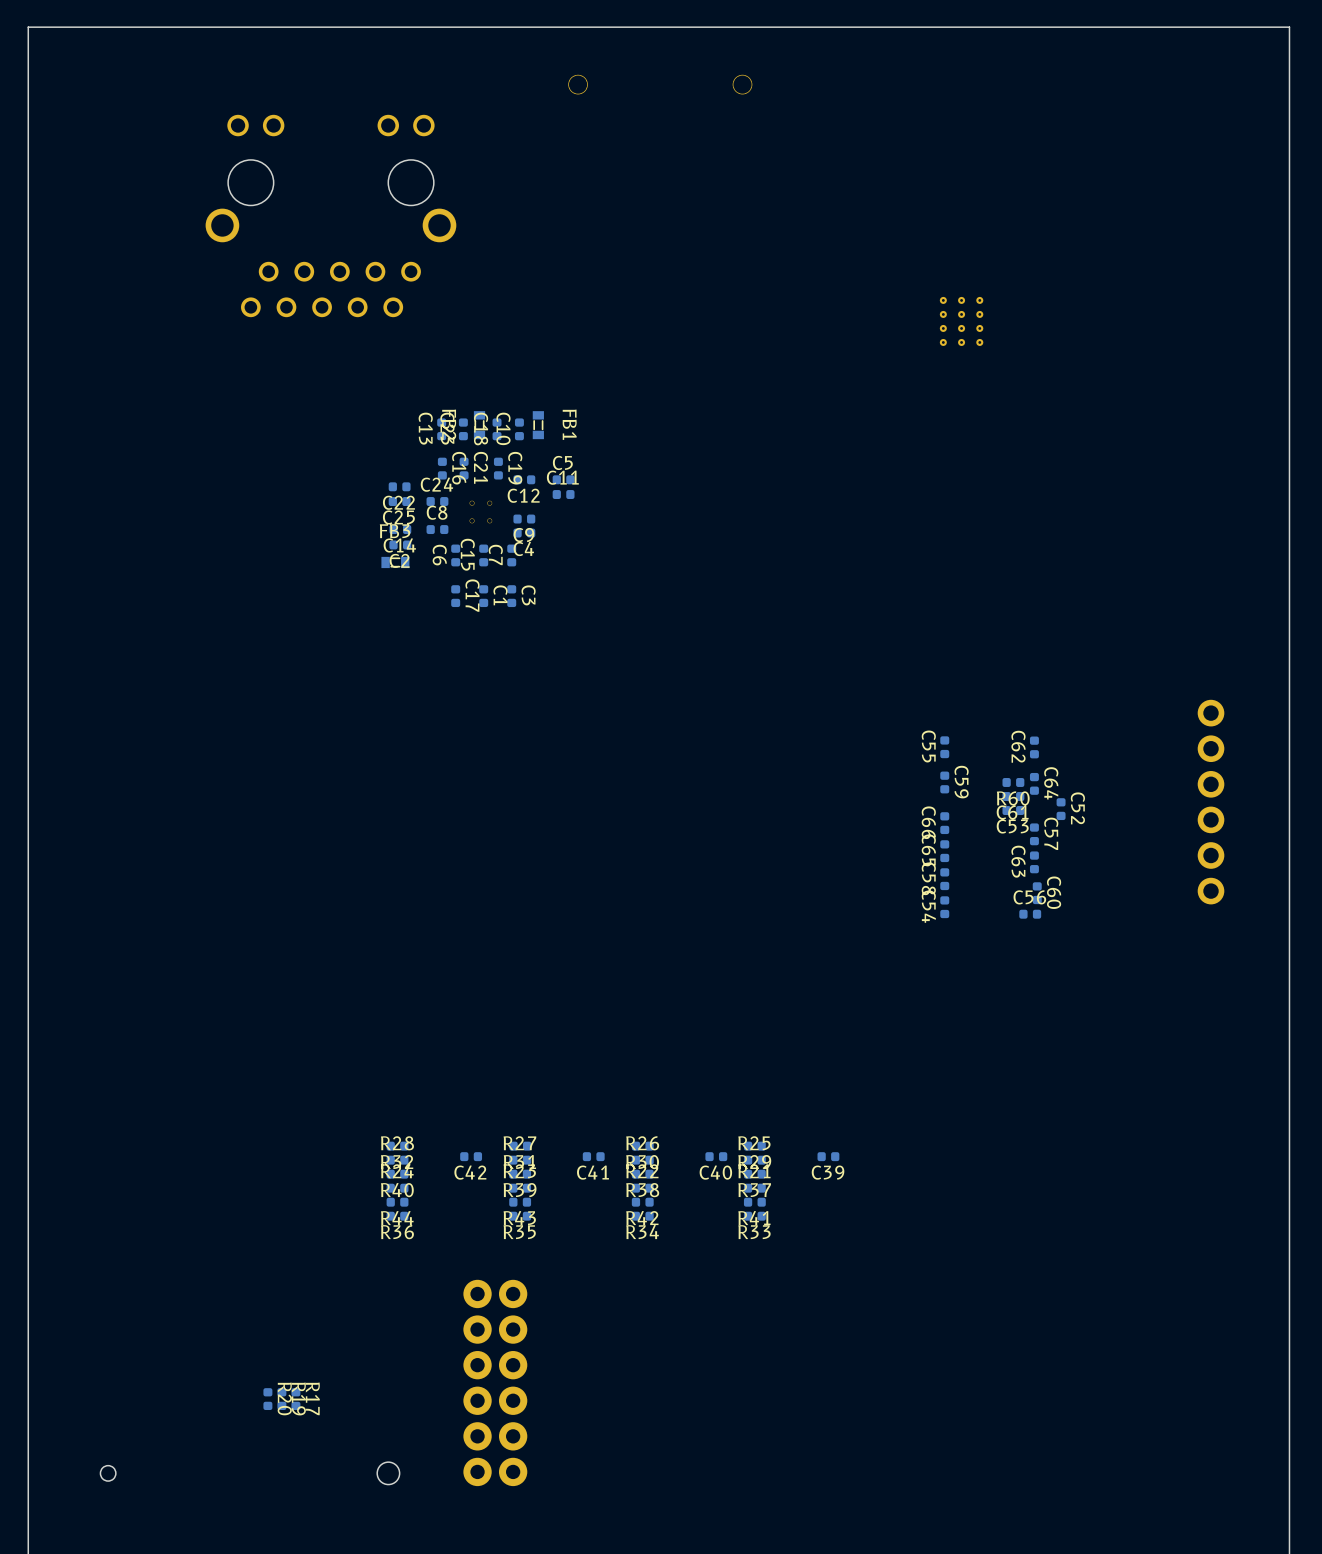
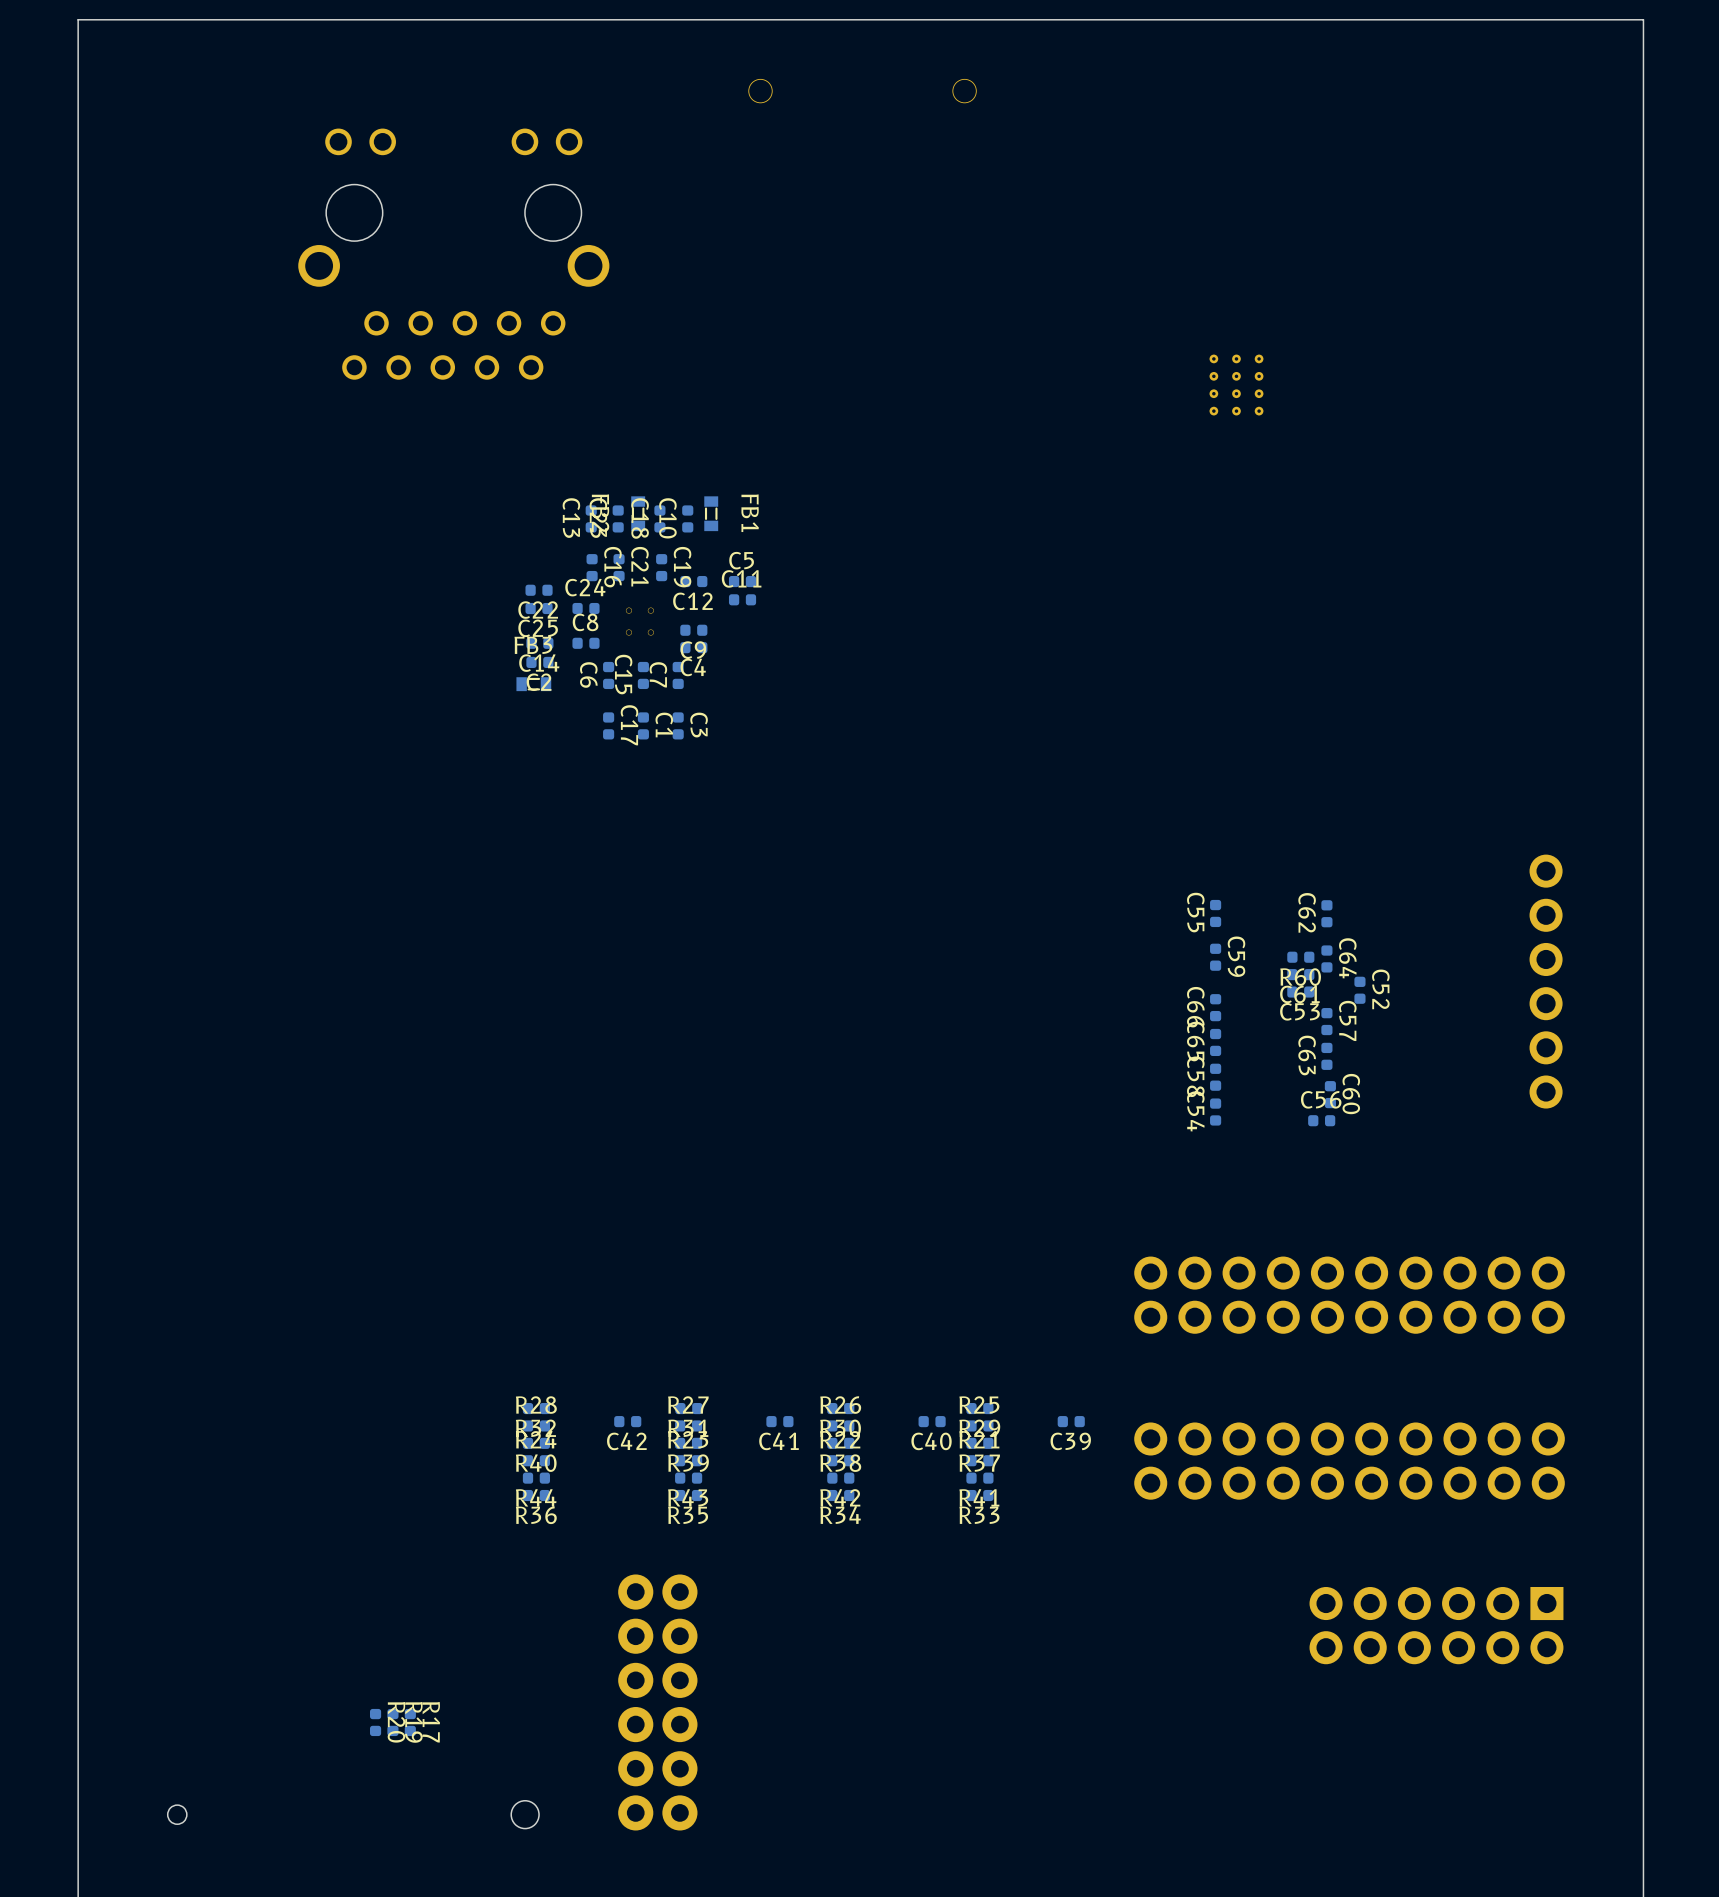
part: none -> (1349, 1295)
part: none -> (1349, 1461)
part: none -> (1436, 1625)

